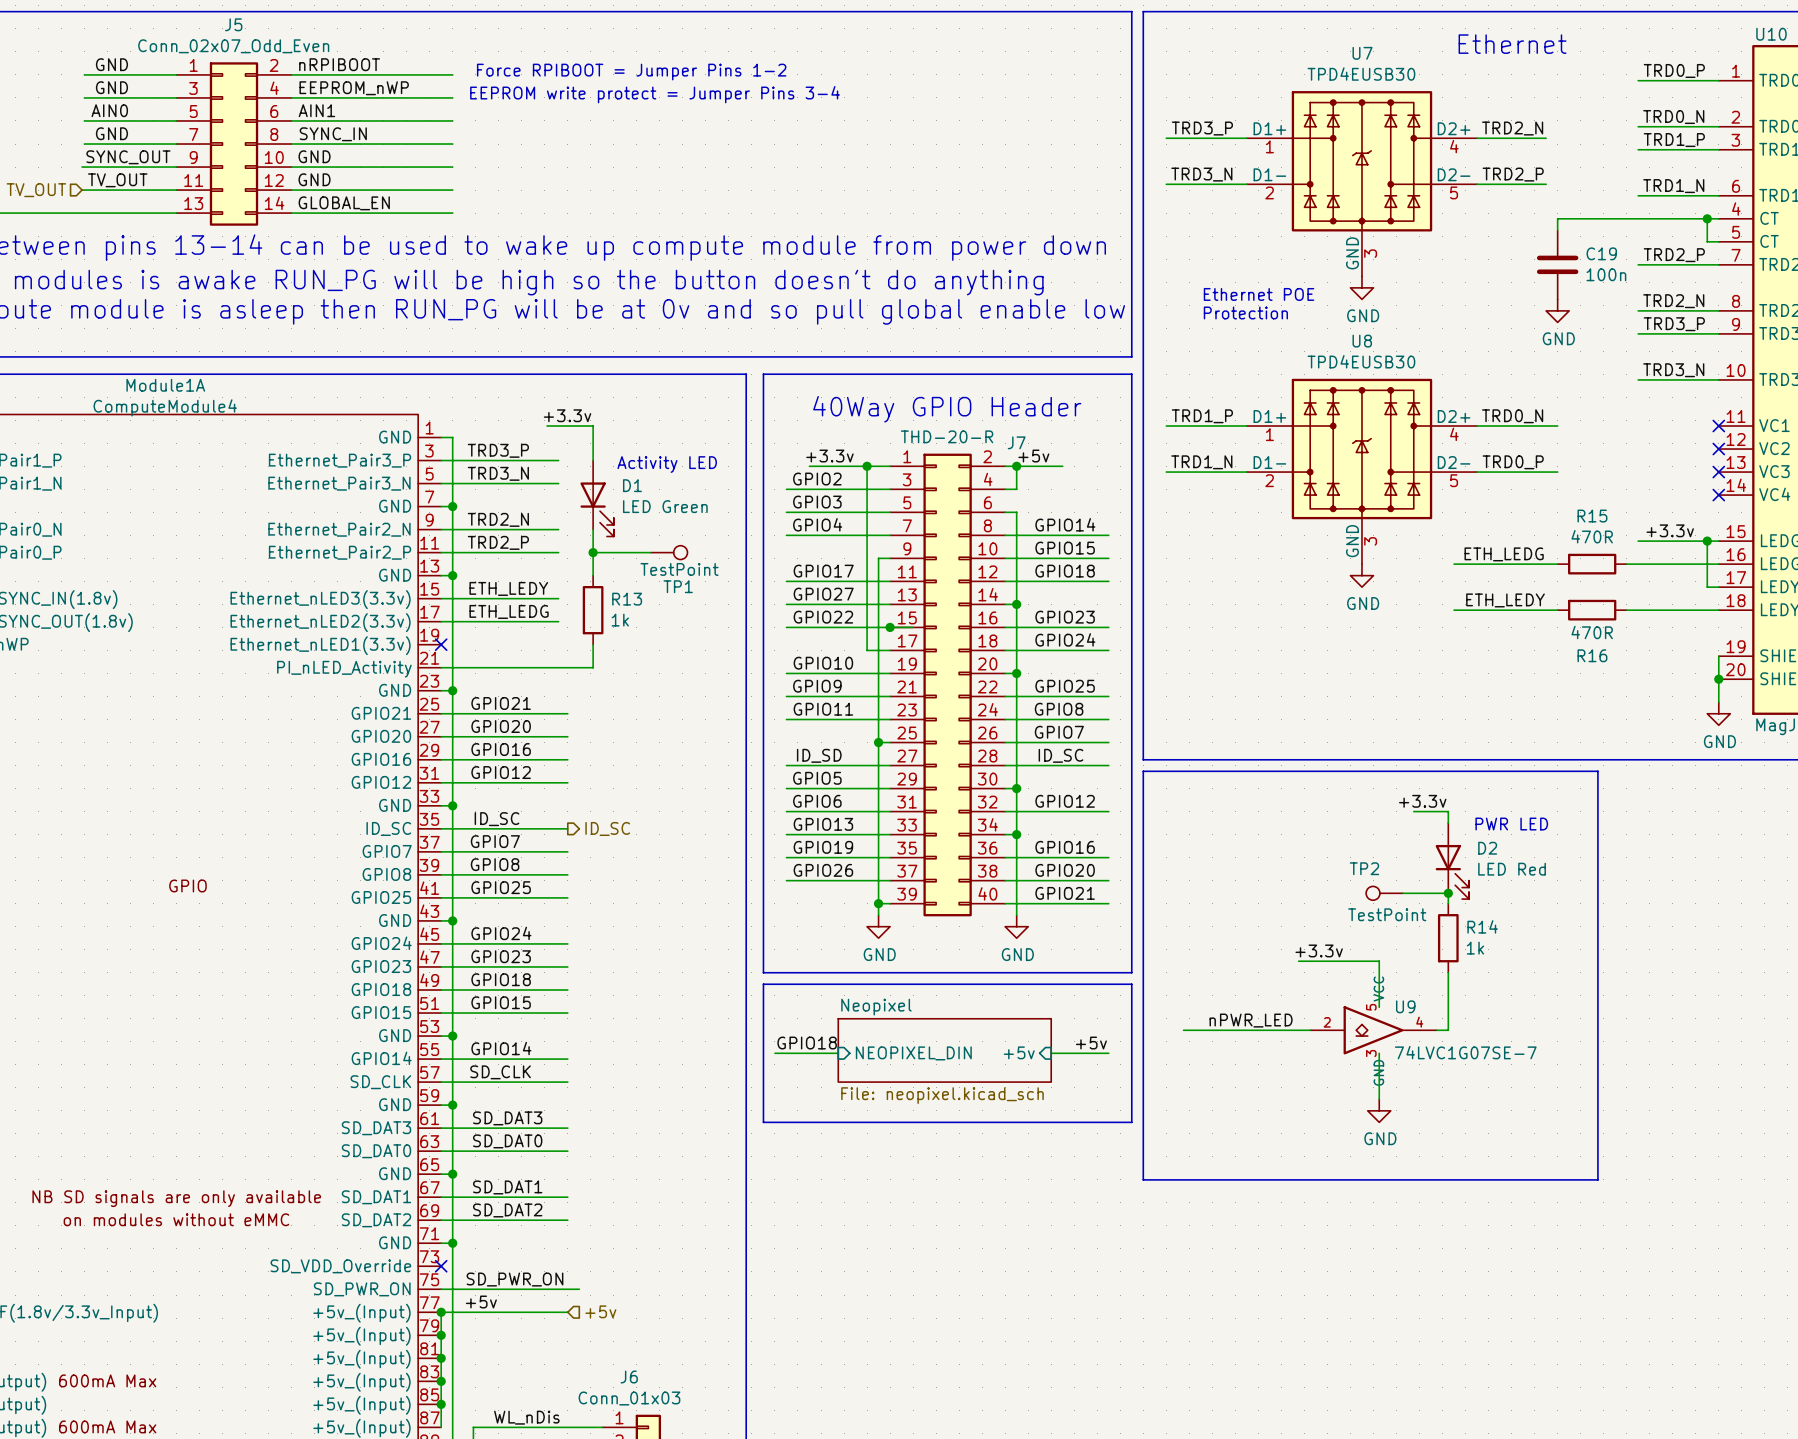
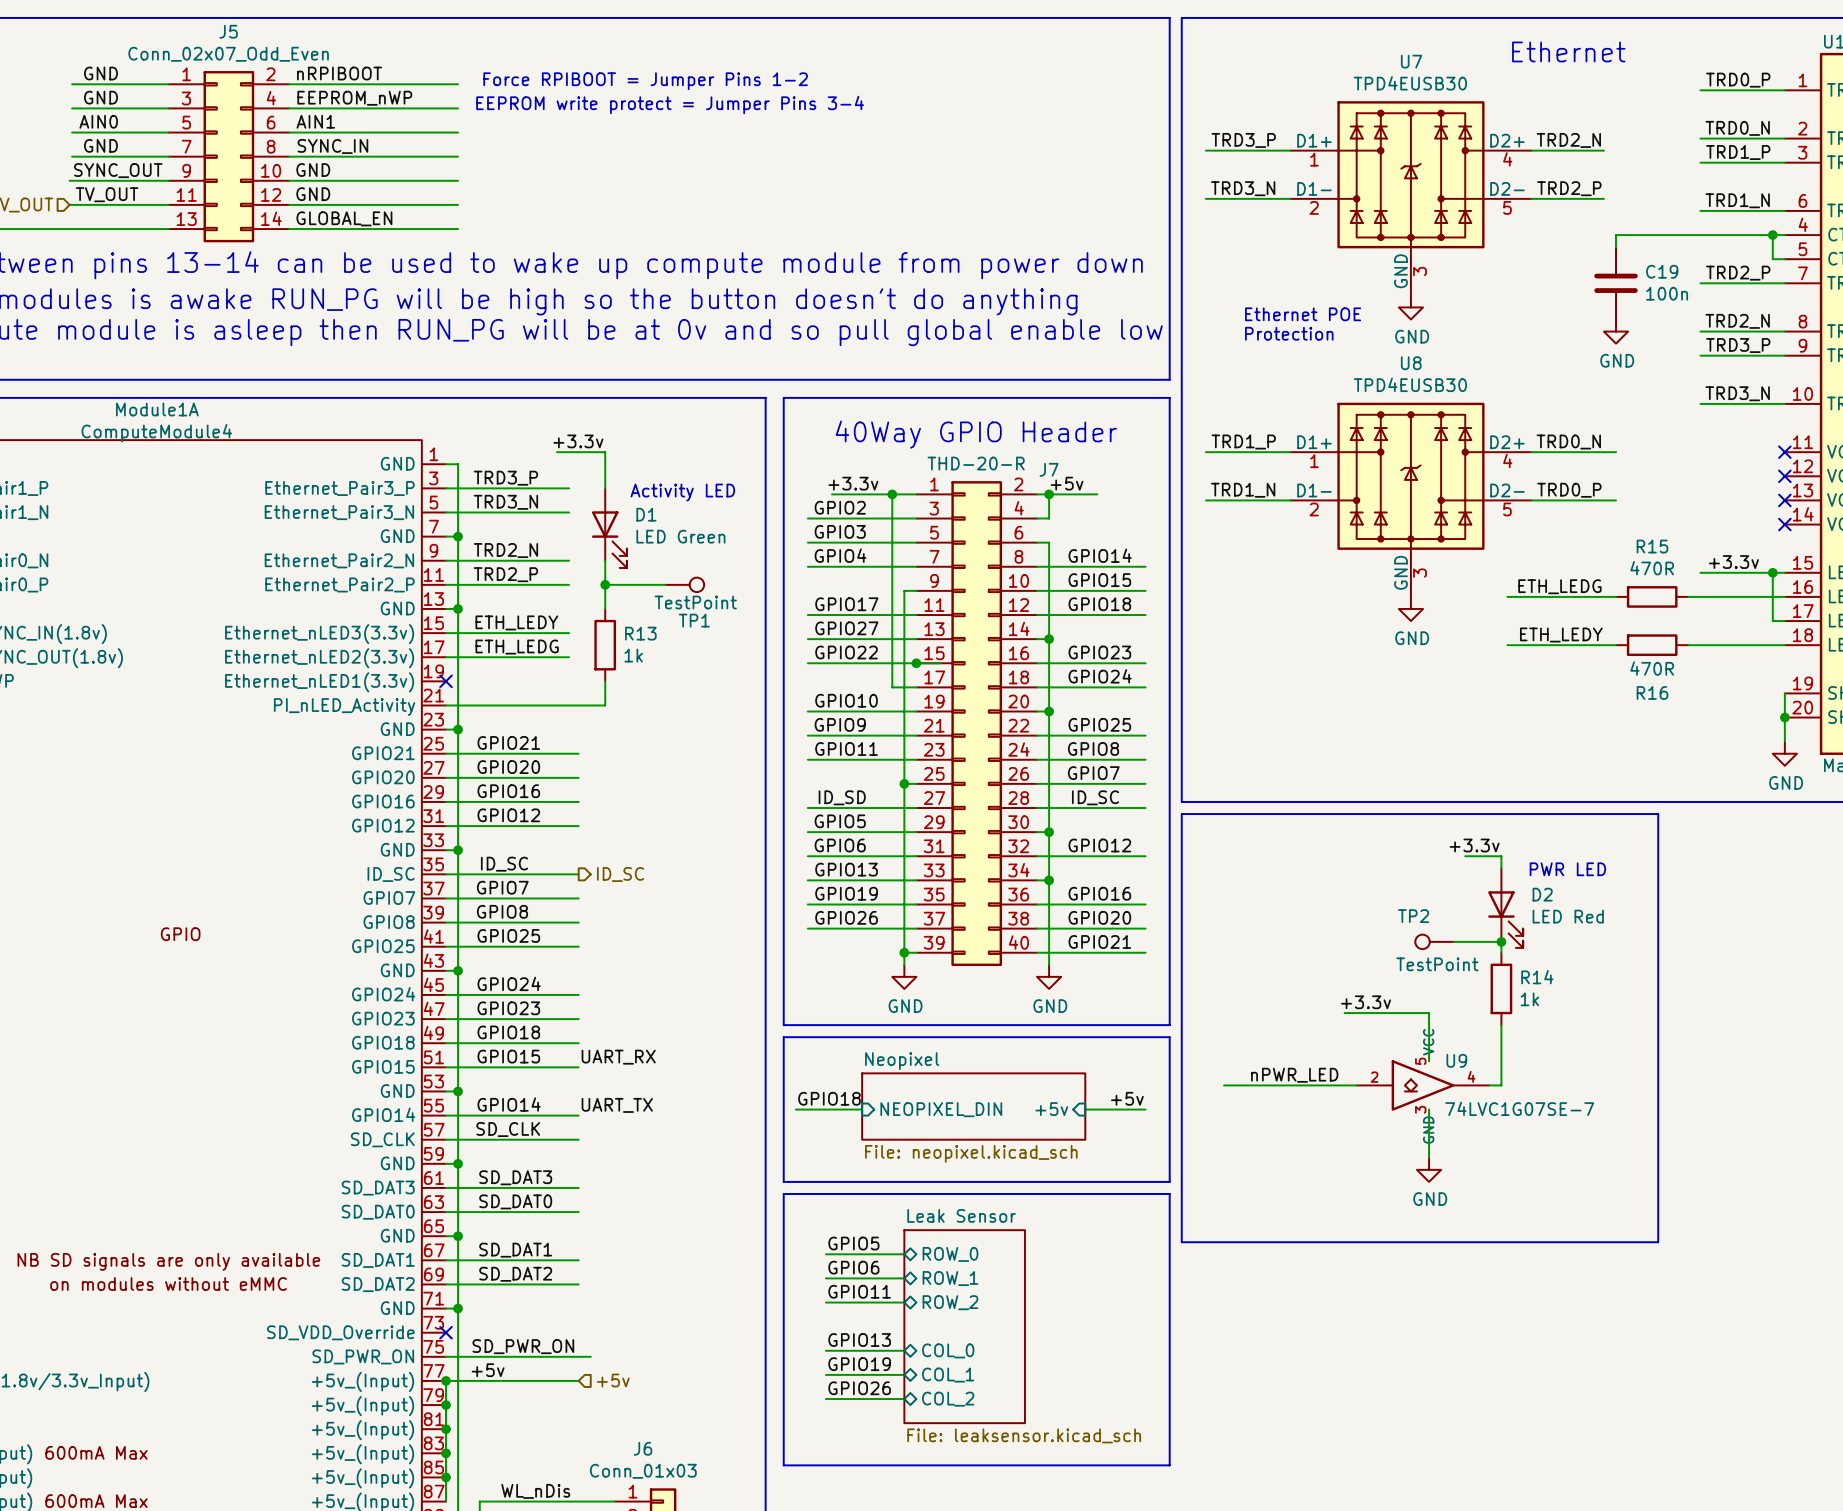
label: none -> UART_RX (618, 1057)
label: none -> UART_TX (617, 1105)
line: none -> (783, 1193) (1169, 1193) (1169, 1465) (783, 1465) (783, 1193)
label: none -> GPIO5 (853, 1243)
wire: none -> (825, 1254) (904, 1254)
sheet pin: none -> ROW_0 (950, 1254)
label: none -> GPIO6 (853, 1267)
wire: none -> (825, 1278) (904, 1278)
sheet pin: none -> ROW_1 (950, 1278)
label: none -> GPIO11 (859, 1291)
wire: none -> (825, 1302) (904, 1302)
sheet pin: none -> ROW_2 (950, 1302)
sheet Leak Sensor: none -> File: leaksensor.kicad_sch (964, 1326)
label: none -> GPIO13 (859, 1340)
wire: none -> (825, 1350) (904, 1350)
sheet pin: none -> COL_0 (948, 1350)
label: none -> GPIO19 (859, 1364)
wire: none -> (825, 1374) (904, 1374)
sheet pin: none -> COL_1 (948, 1375)
label: none -> GPIO26 (859, 1388)
wire: none -> (825, 1399) (904, 1399)
sheet pin: none -> COL_2 (948, 1399)

